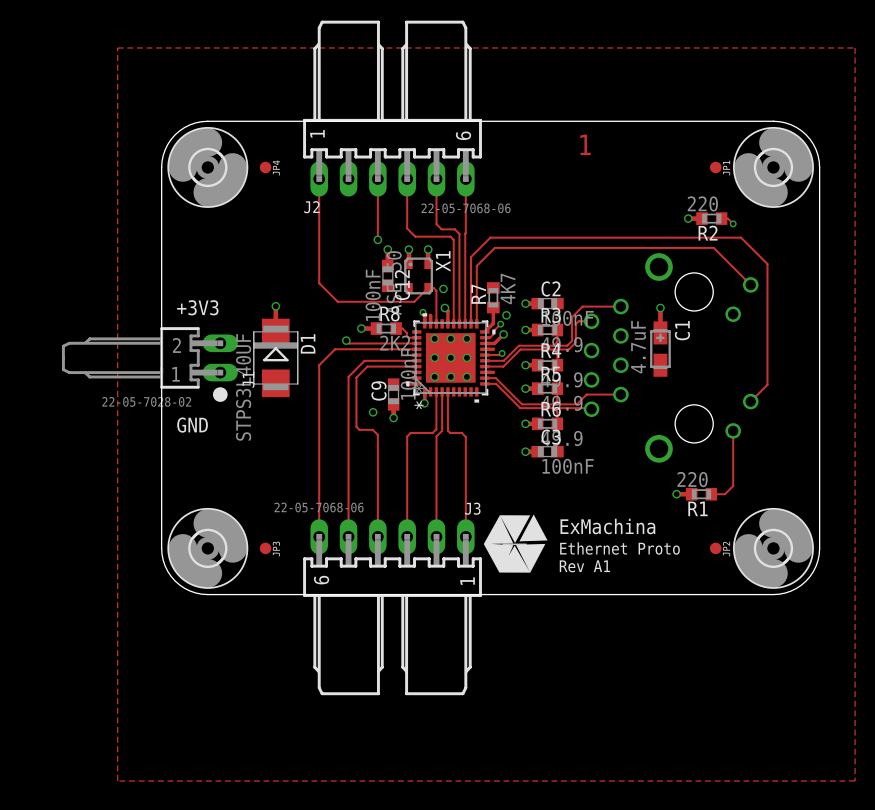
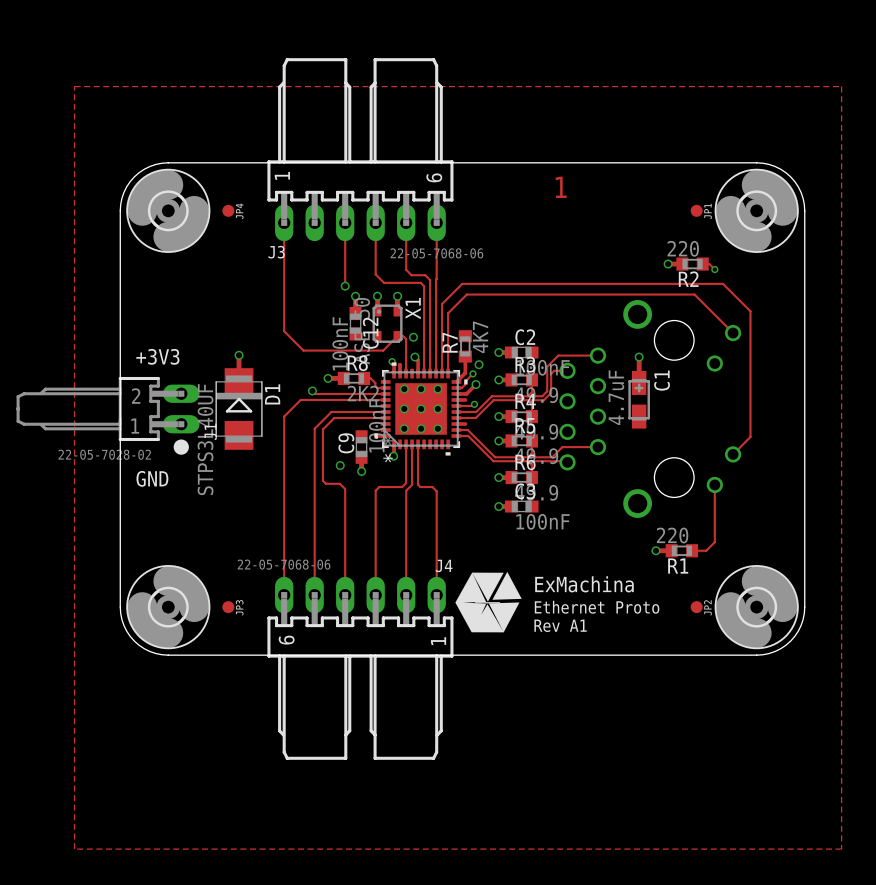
J2 name: J2 (311, 207) -> J3 (276, 252)
J3 name: J3 (472, 508) -> J4 (444, 565)

